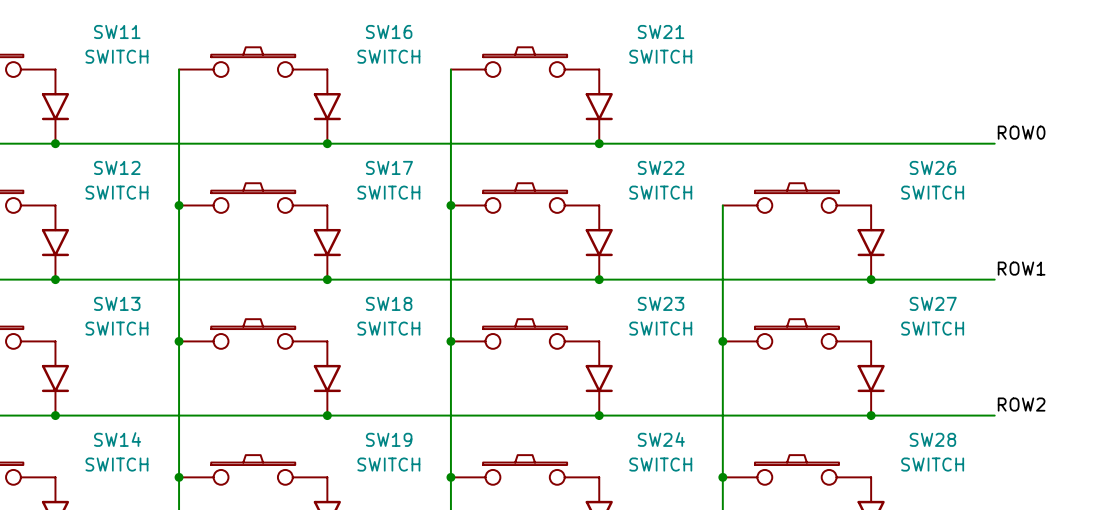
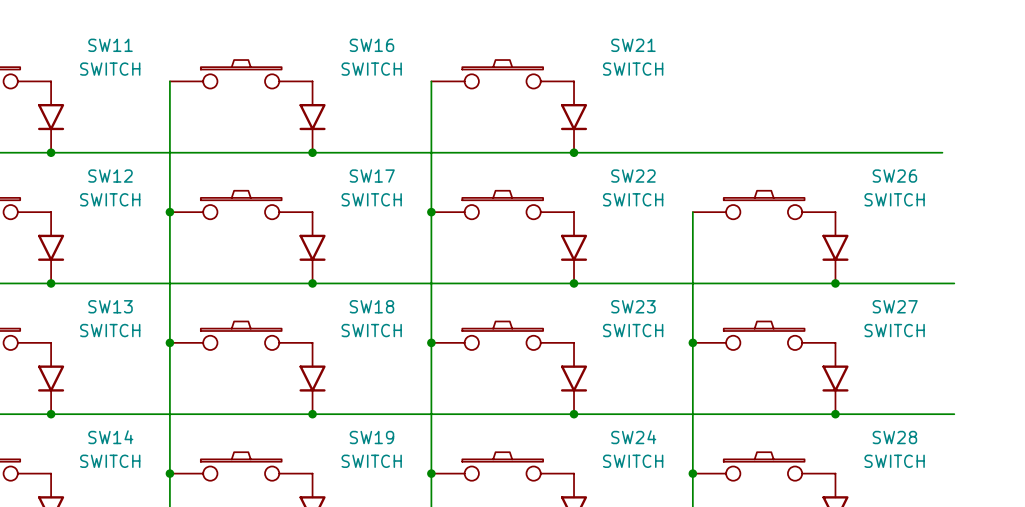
label: ROW0 (1021, 132) -> none
wire: (982, 143) (994, 143) -> none
label: ROW1 (1021, 268) -> none
label: ROW2 (1021, 404) -> none

